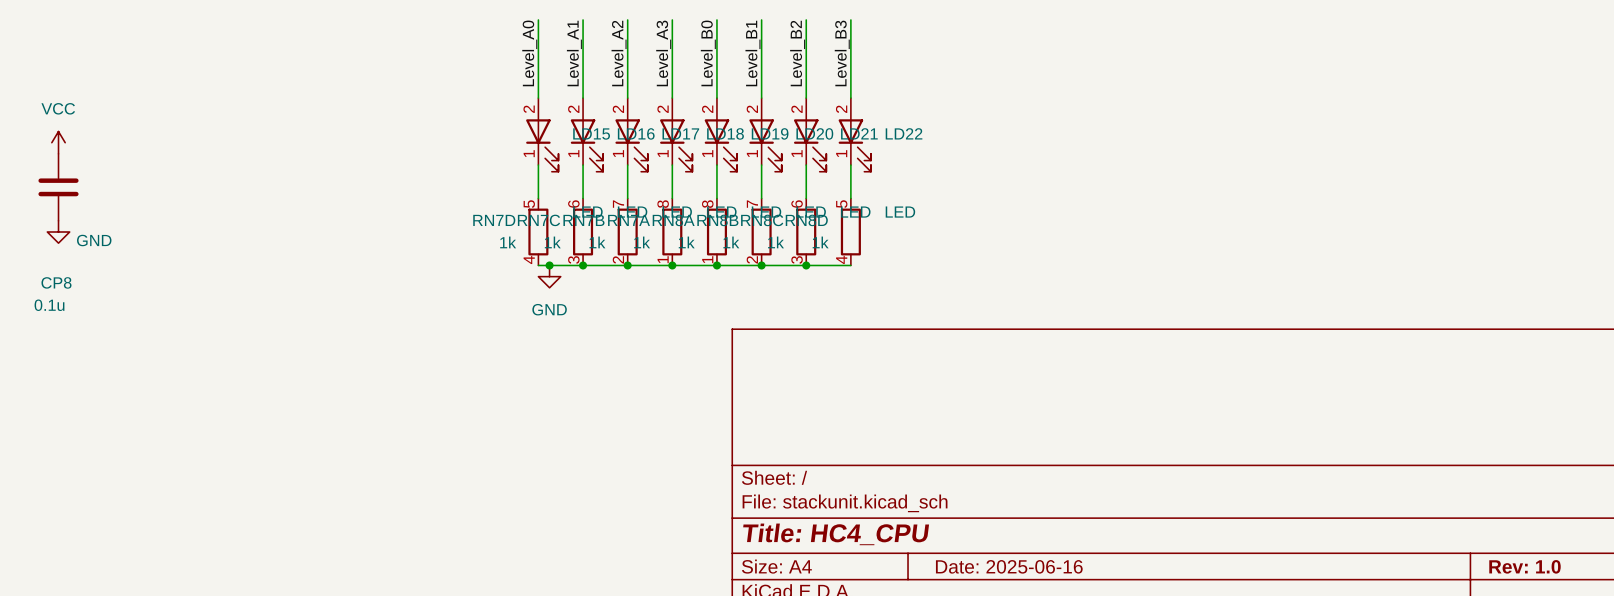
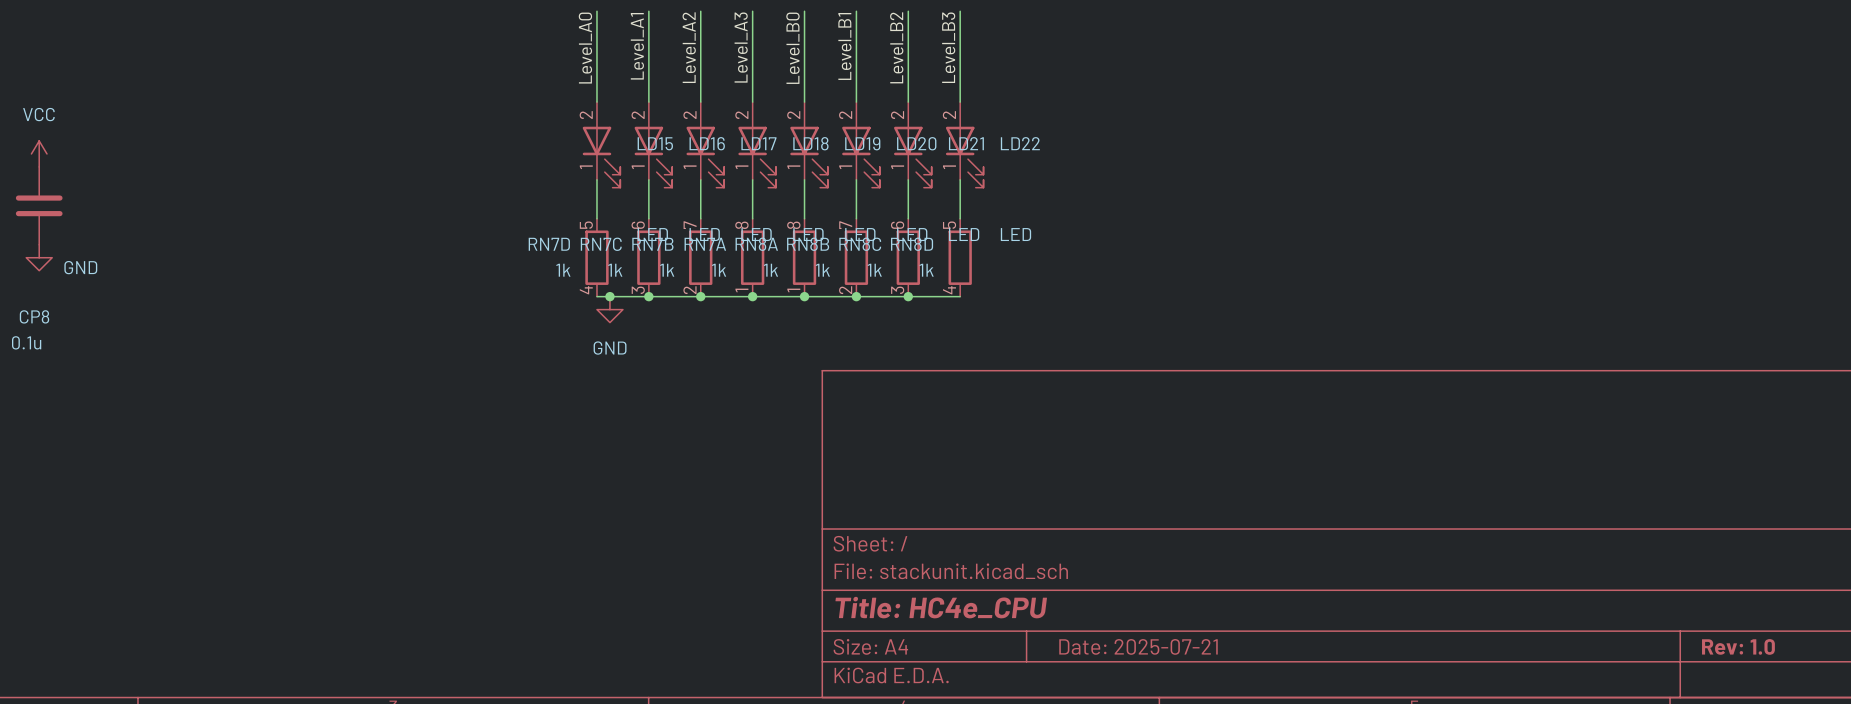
title block: Title: HC4_CPU (836, 534) -> Title: HC4e_CPU (941, 607)
title block: Date: 2025-06-16 (1009, 566) -> Date: 2025-07-21 (1138, 646)

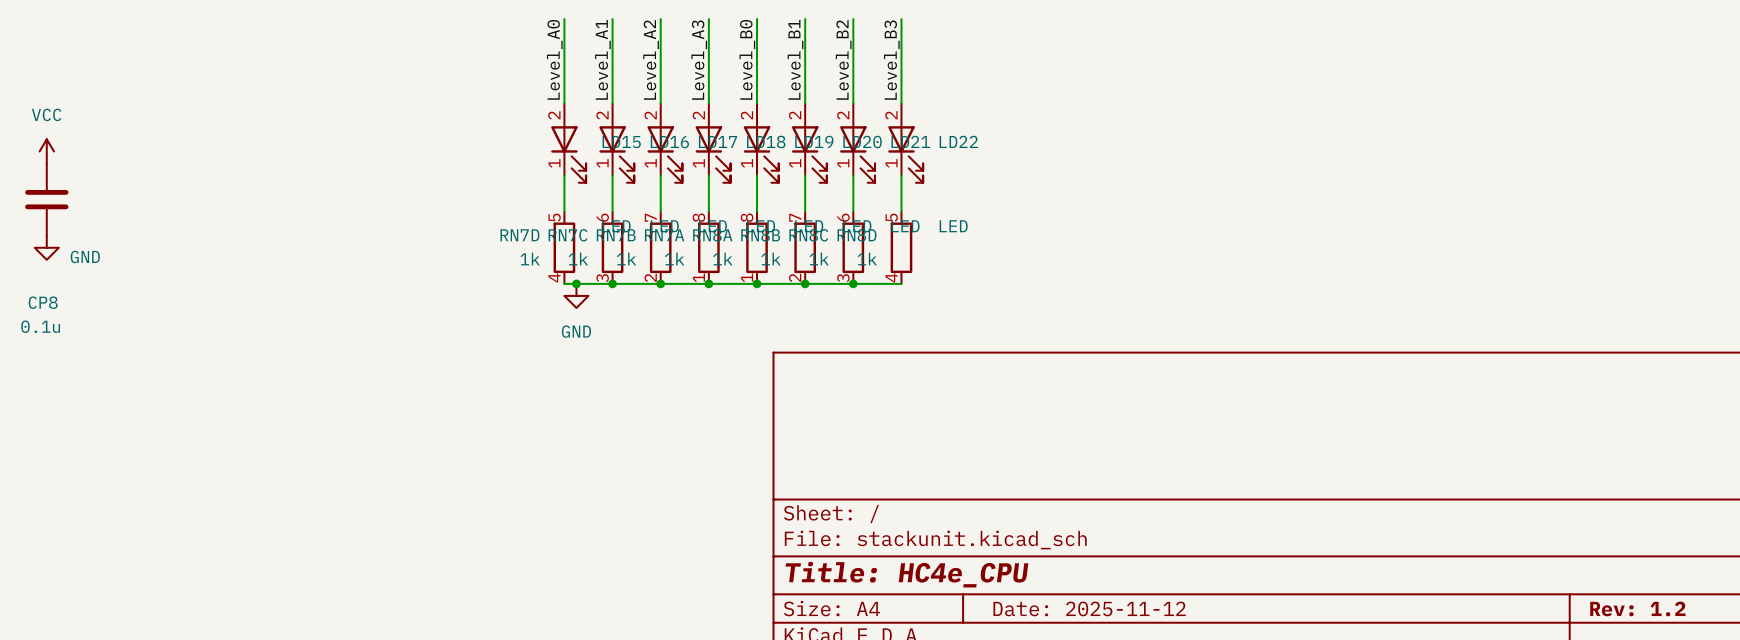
title block: Date: 2025-07-21 (1138, 646) -> Date: 2025-11-12 (1089, 608)
title block: Rev: 1.0 (1738, 646) -> Rev: 1.2 (1637, 608)

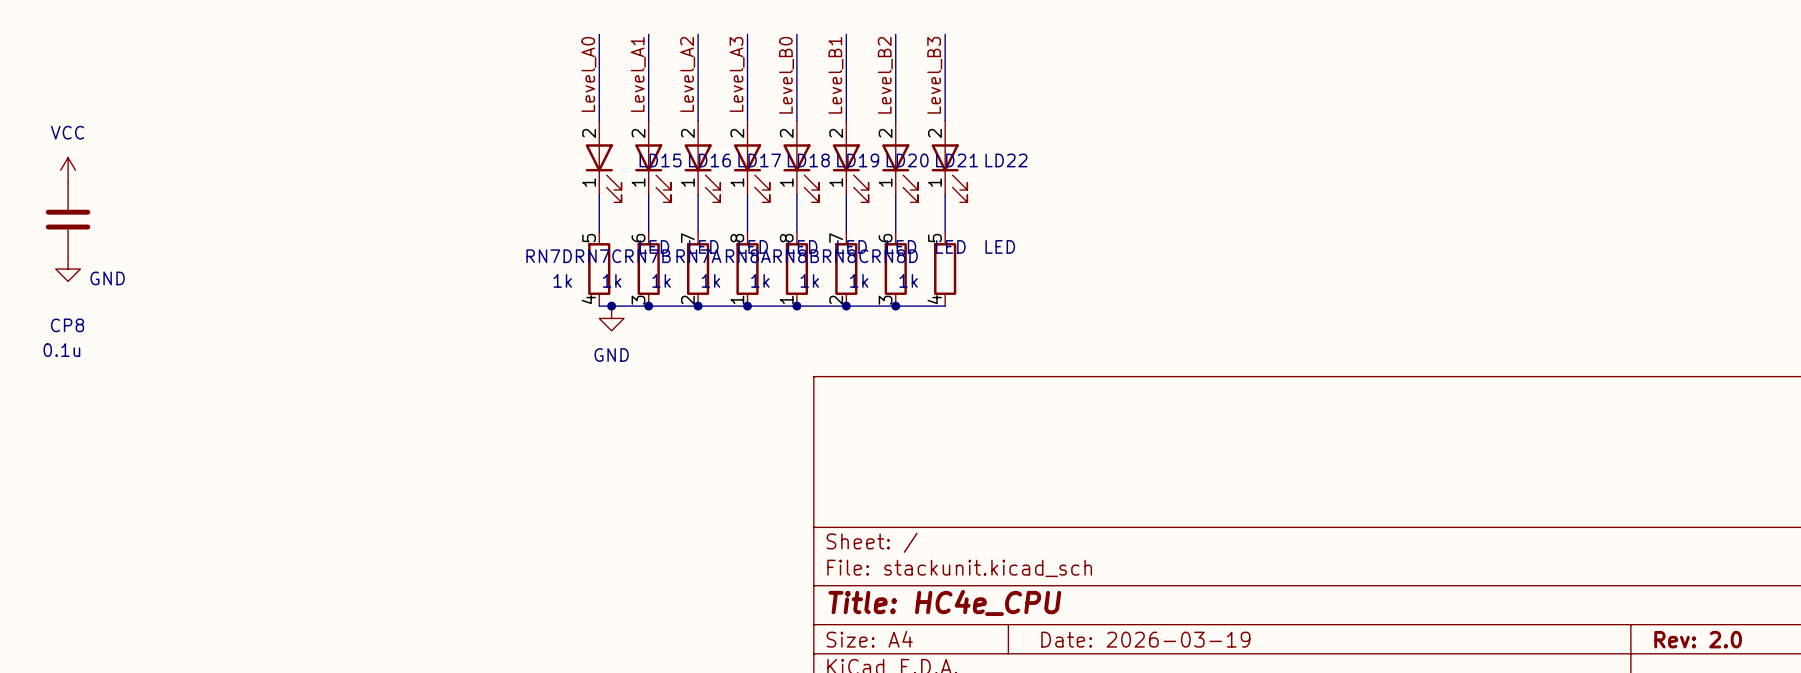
title block: Date: 2025-11-12 (1089, 608) -> Date: 2026-03-19 (1145, 639)
title block: Rev: 1.2 (1637, 608) -> Rev: 2.0 (1698, 639)

